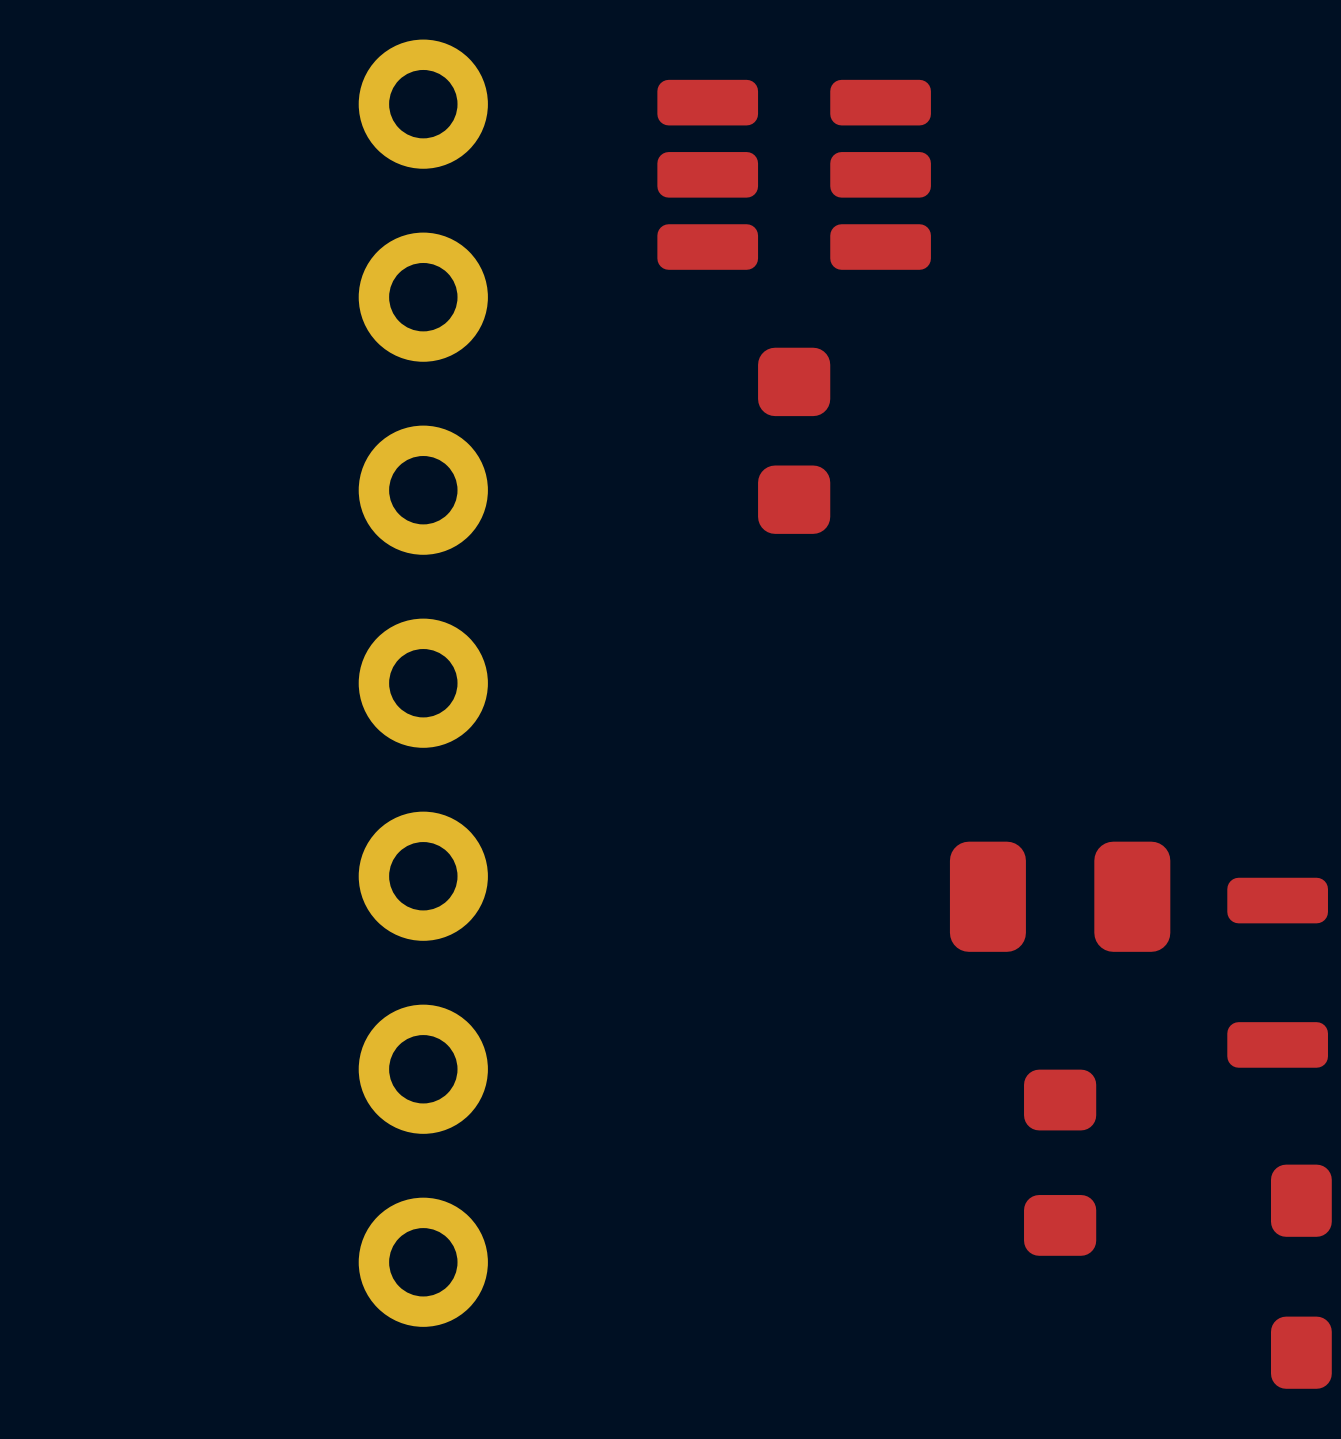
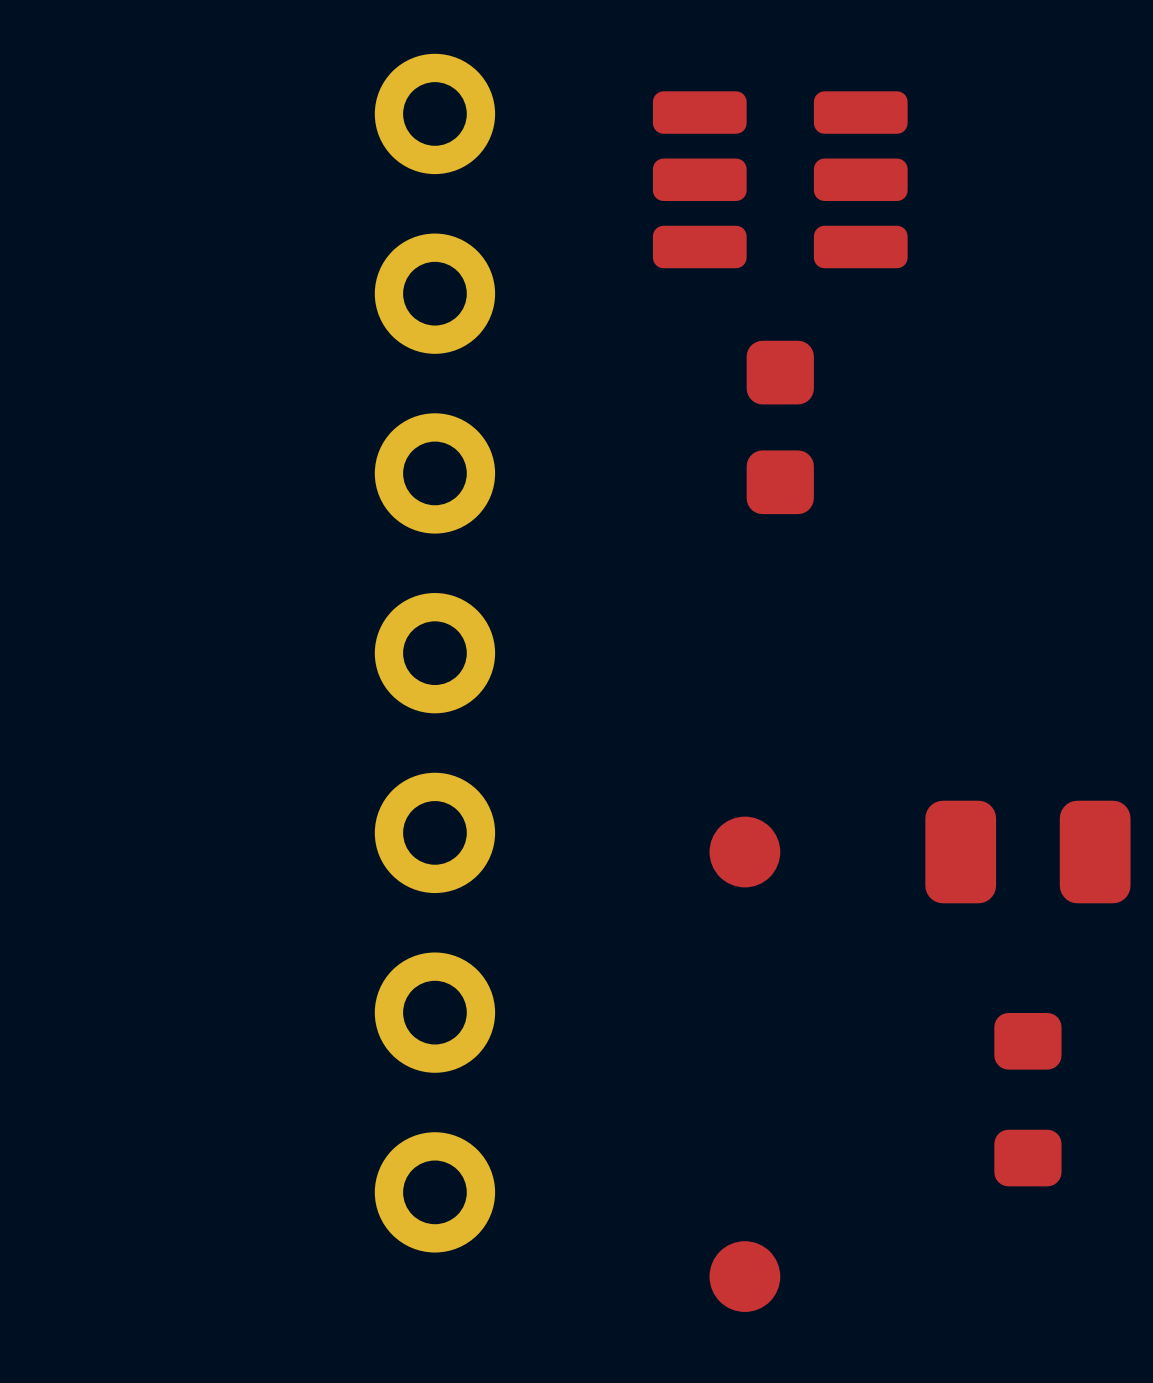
part: none -> (744, 852)
part: none -> (744, 1276)

